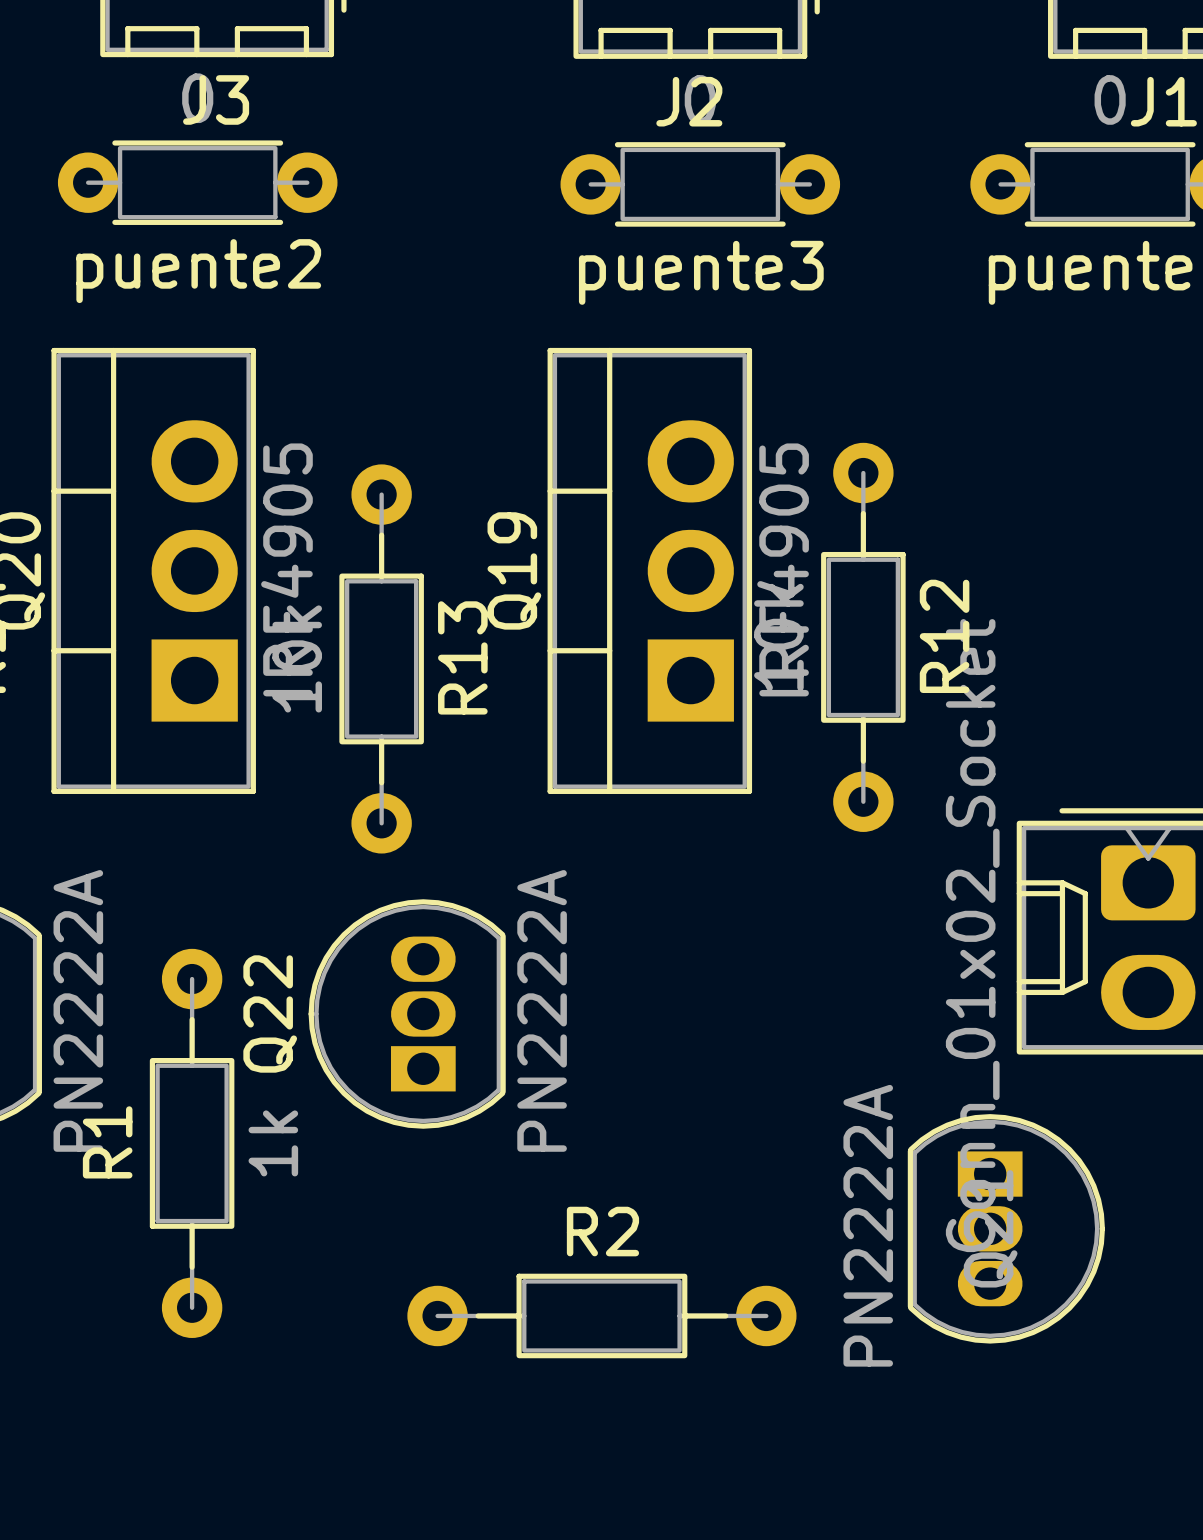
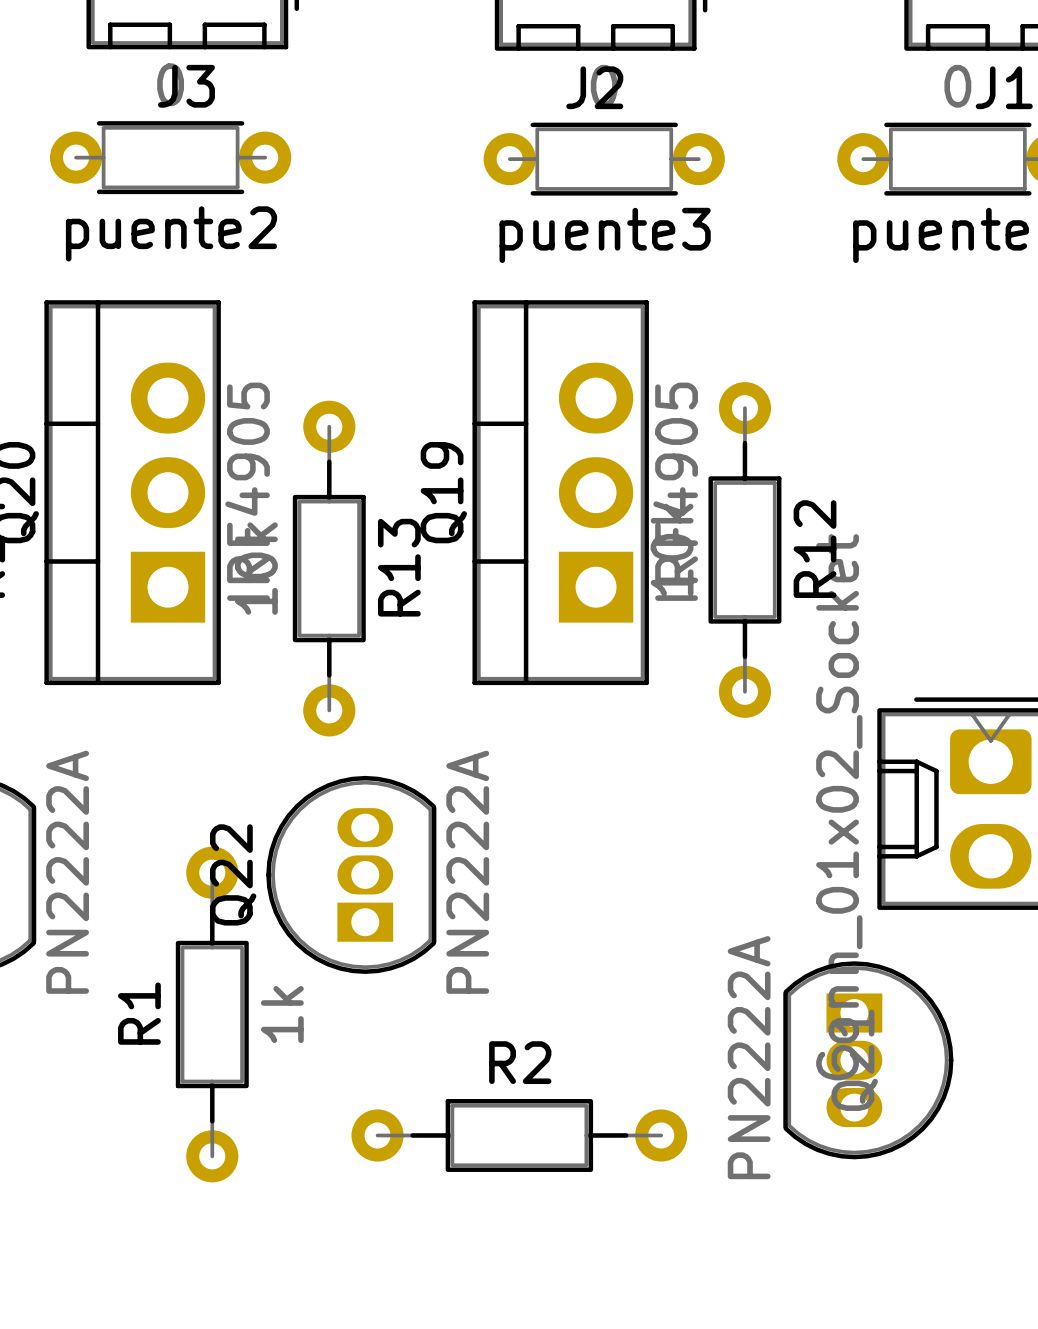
R1 position: (192, 1143) -> (212, 1014)

